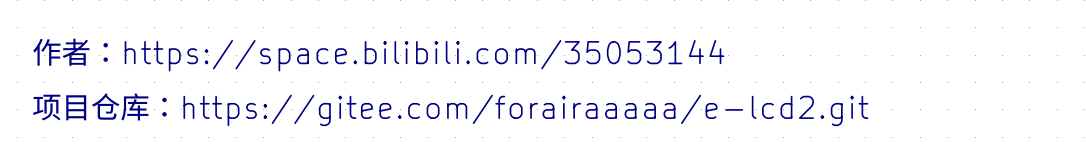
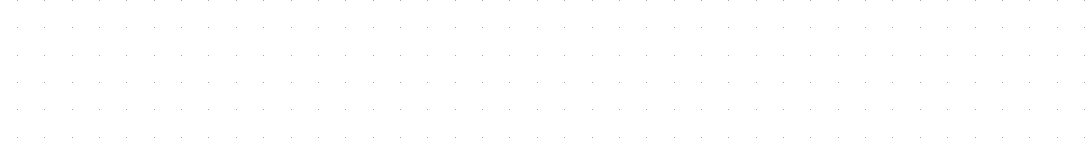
text: 作者：https://space.bilibili.com/35053144 (378, 54) -> none
text: 项目仓库：https://gitee.com/forairaaaaa/e-lcd2.git (450, 109) -> none

